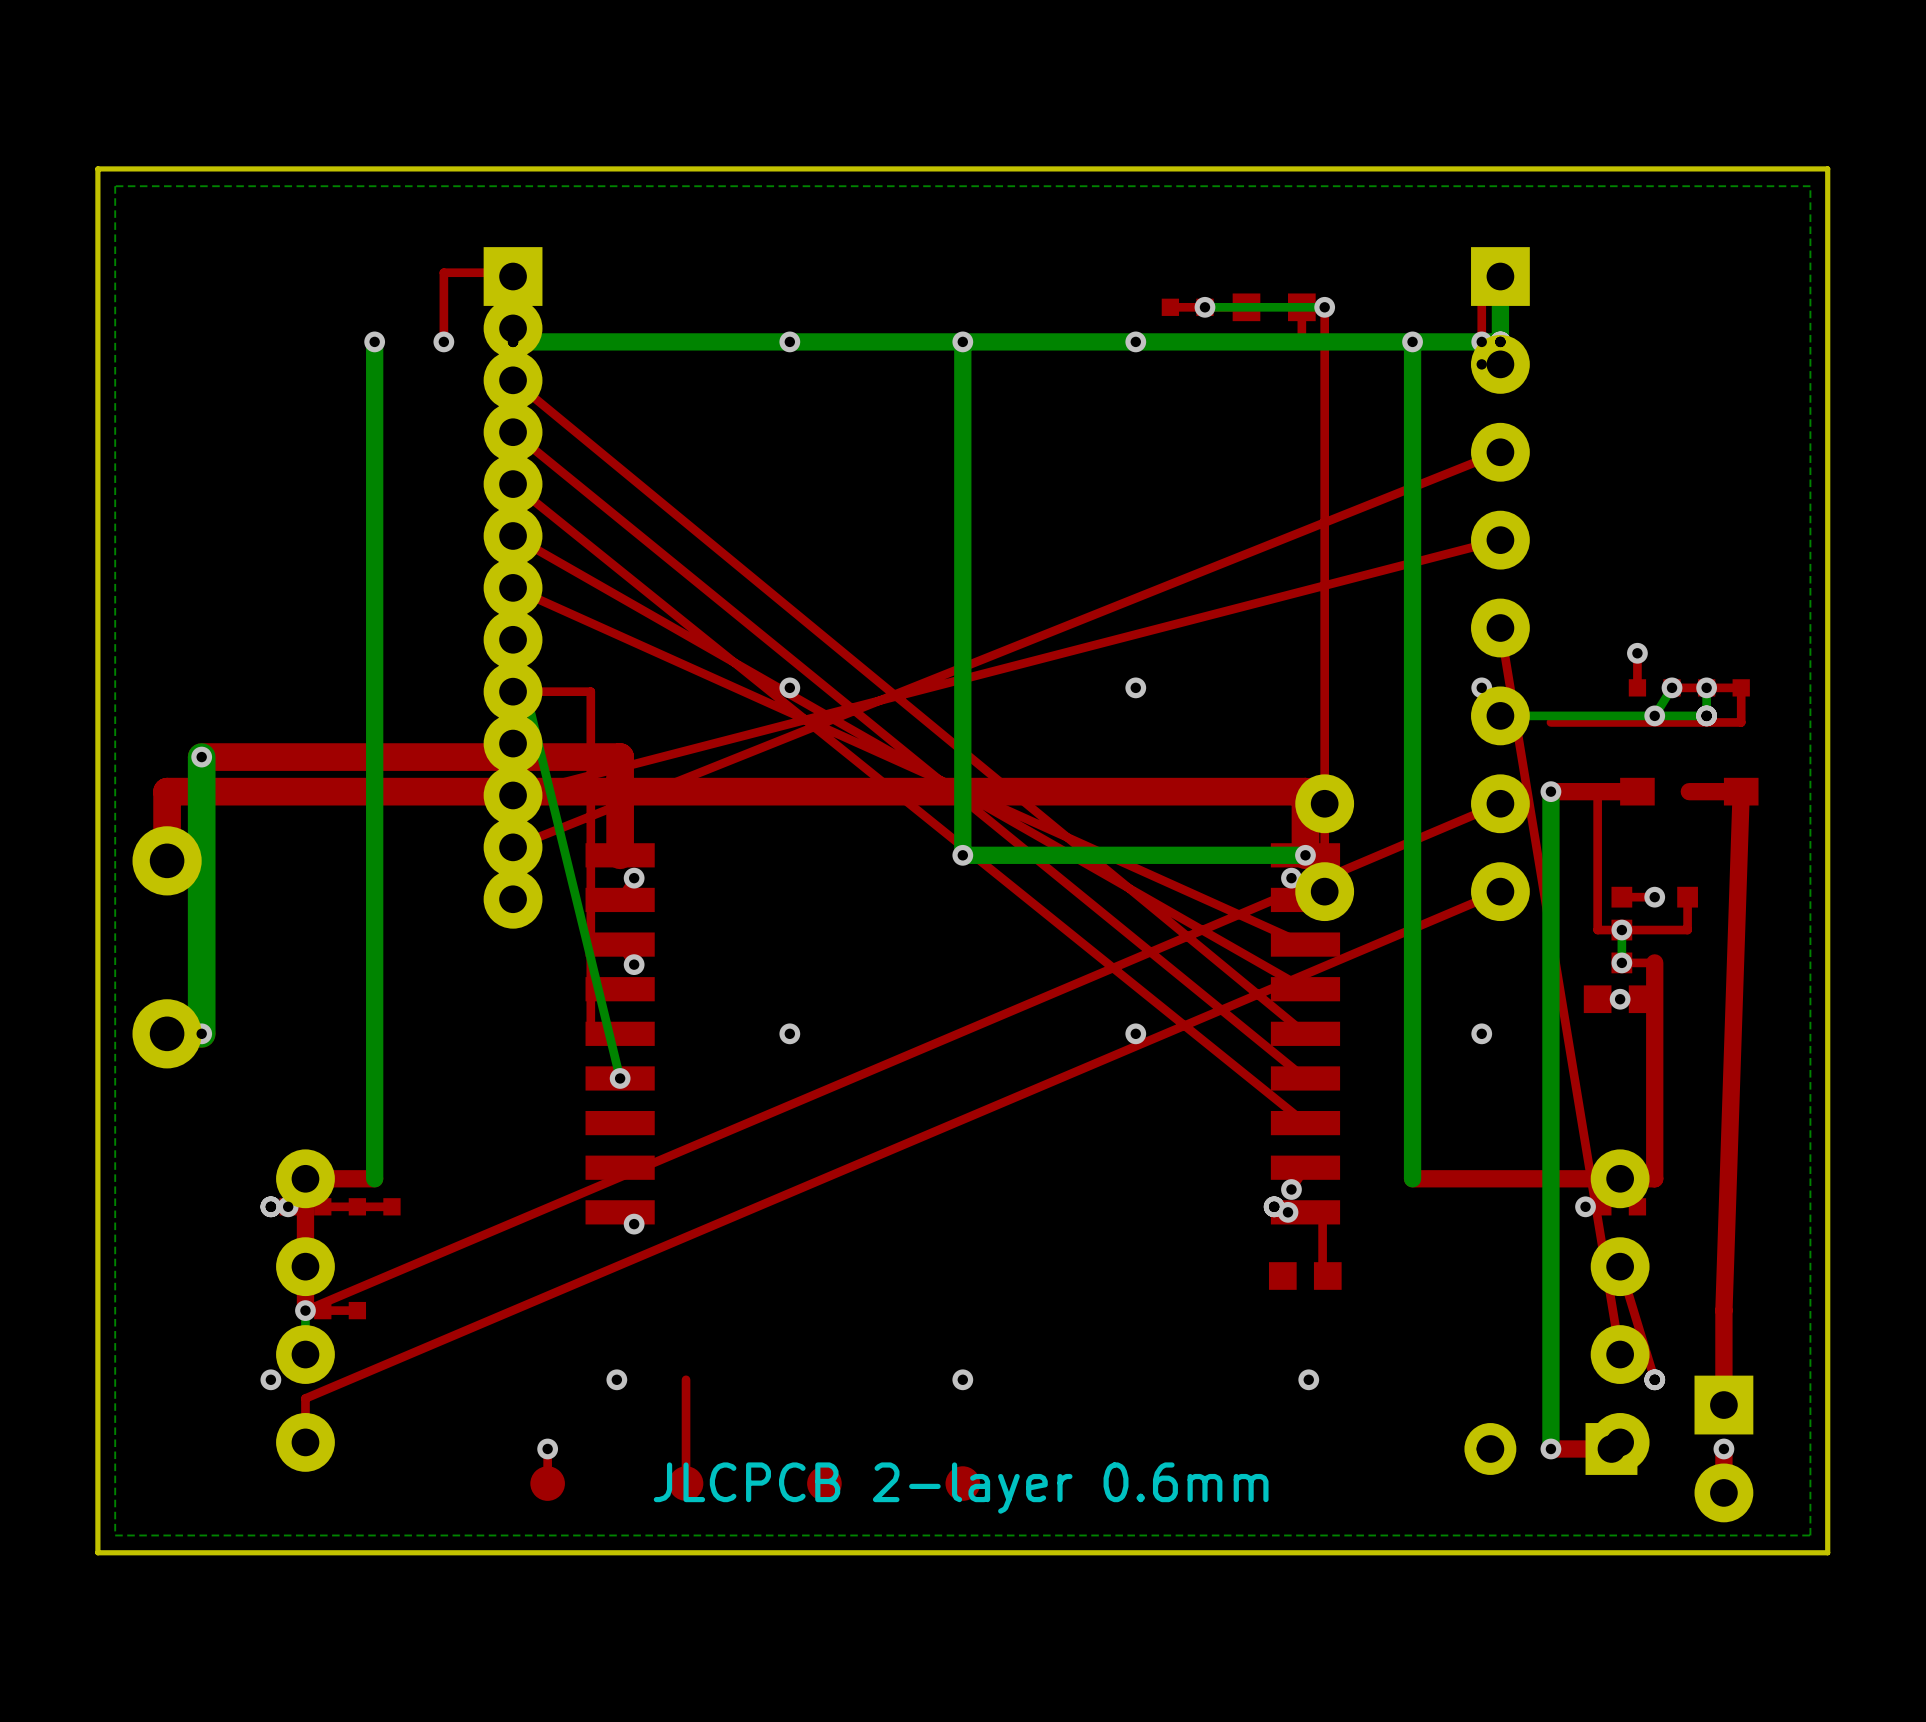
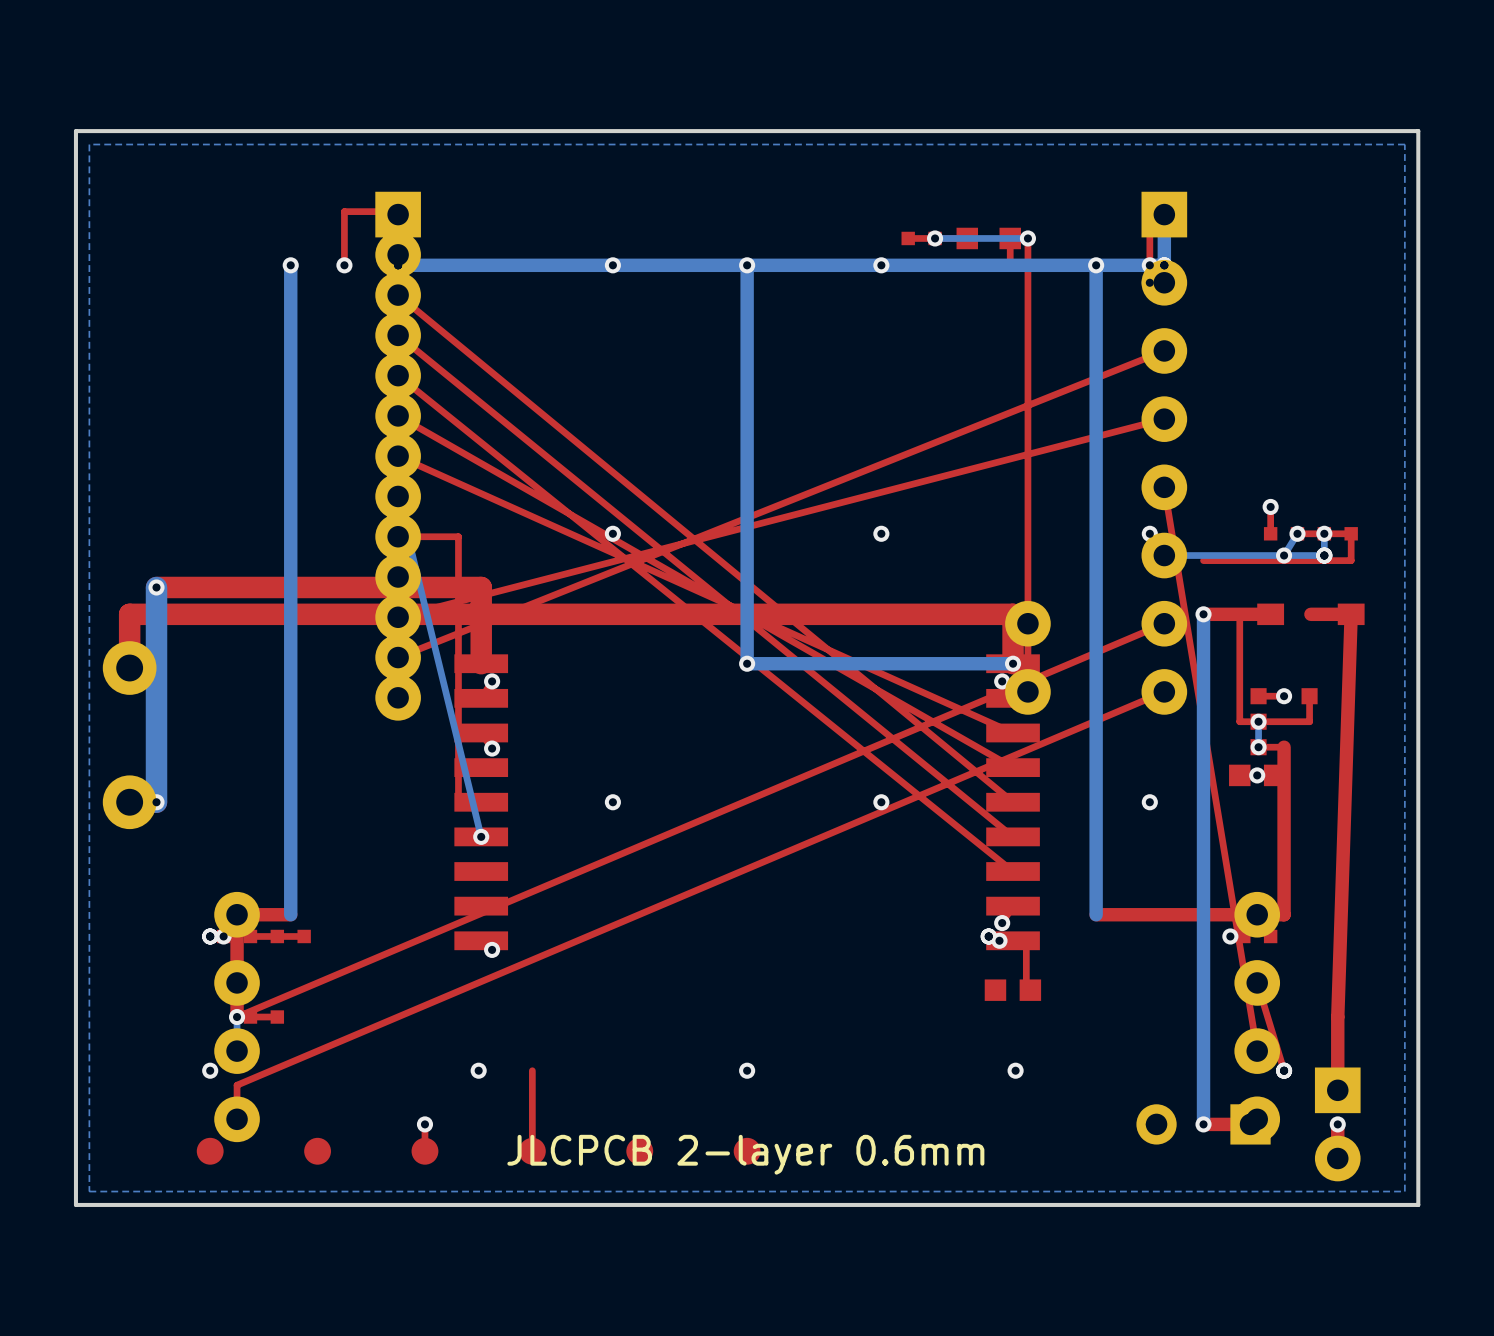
part: none -> (210, 1151)
part: none -> (317, 1151)

